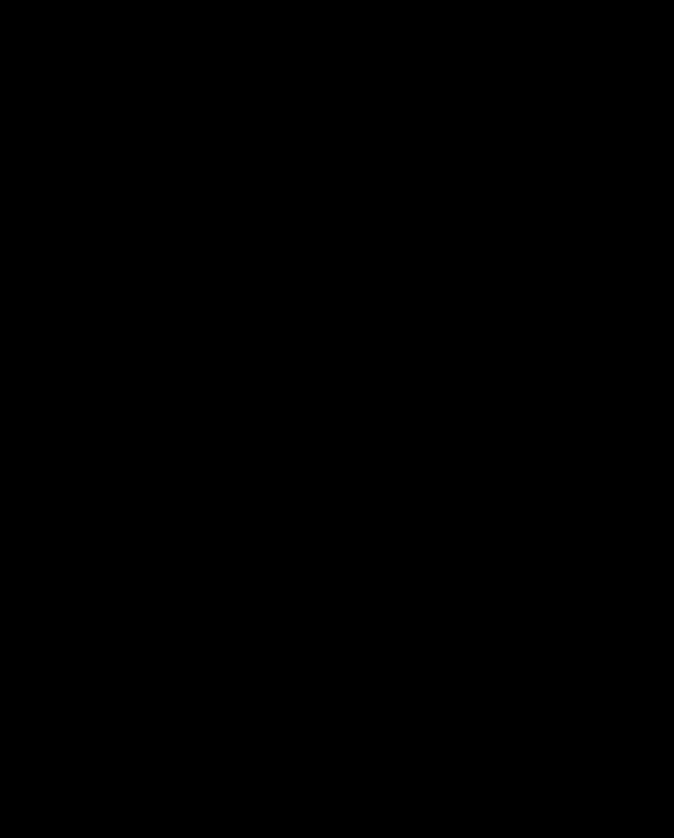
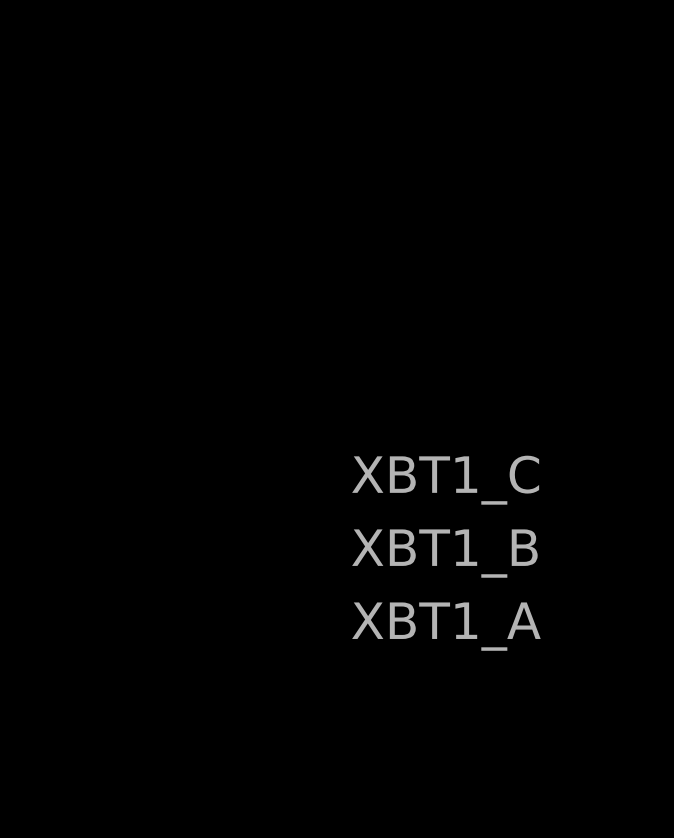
label: none -> XBT1_C (445, 480)
label: none -> XBT1_B (444, 553)
label: none -> XBT1_A (446, 626)

